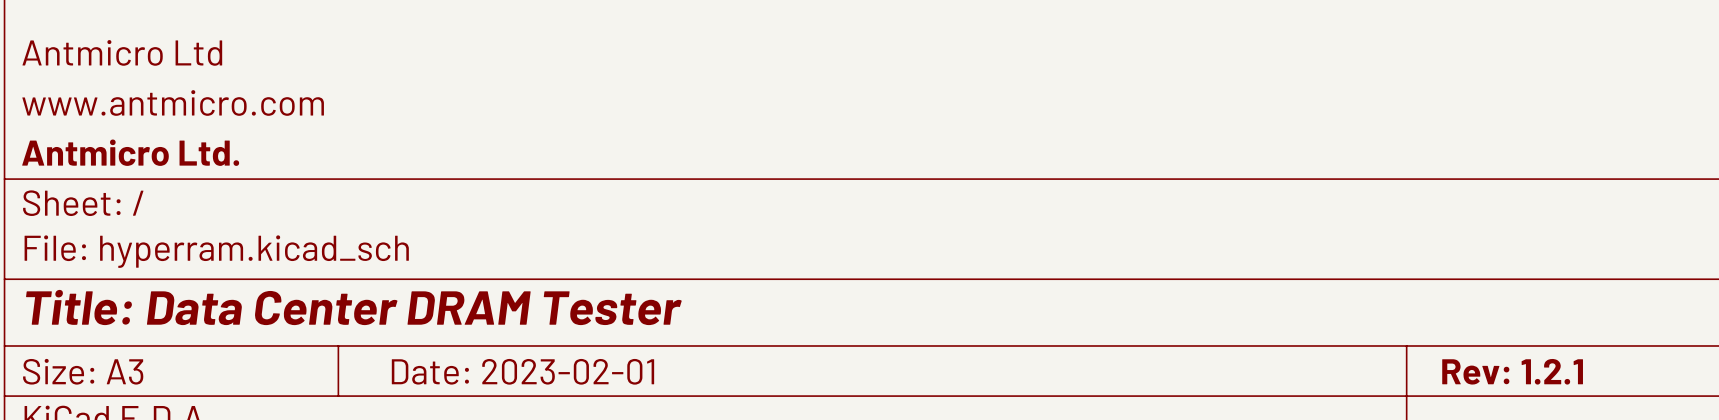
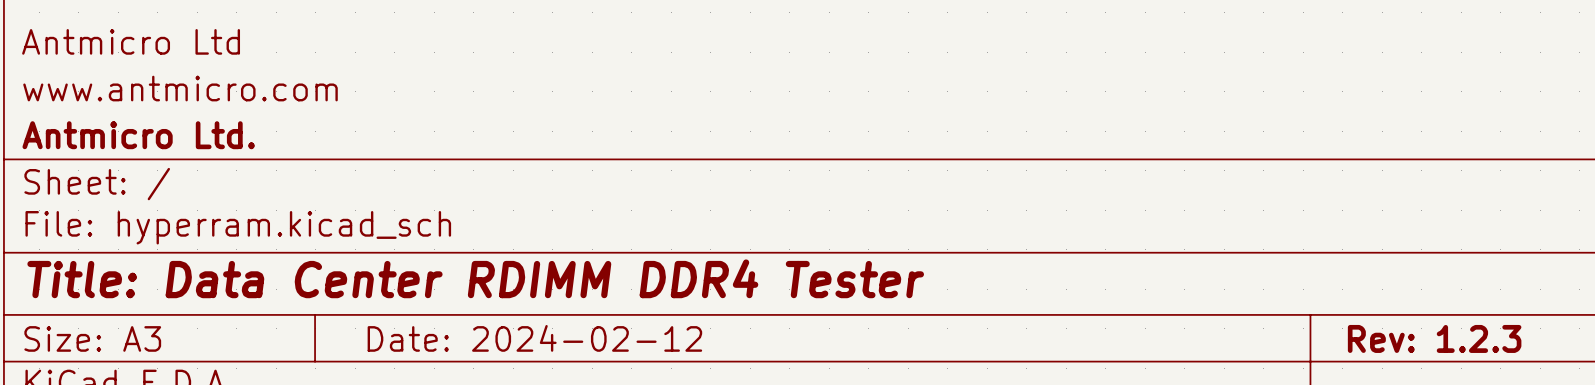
title block: Title: Data Center DRAM Tester (353, 307) -> Title: Data Center RDIMM DDR4 Tester (475, 278)
title block: Date: 2023-02-01 (522, 371) -> Date: 2024-02-12 (534, 338)
title block: Rev: 1.2.1 (1512, 371) -> Rev: 1.2.3 (1434, 338)

